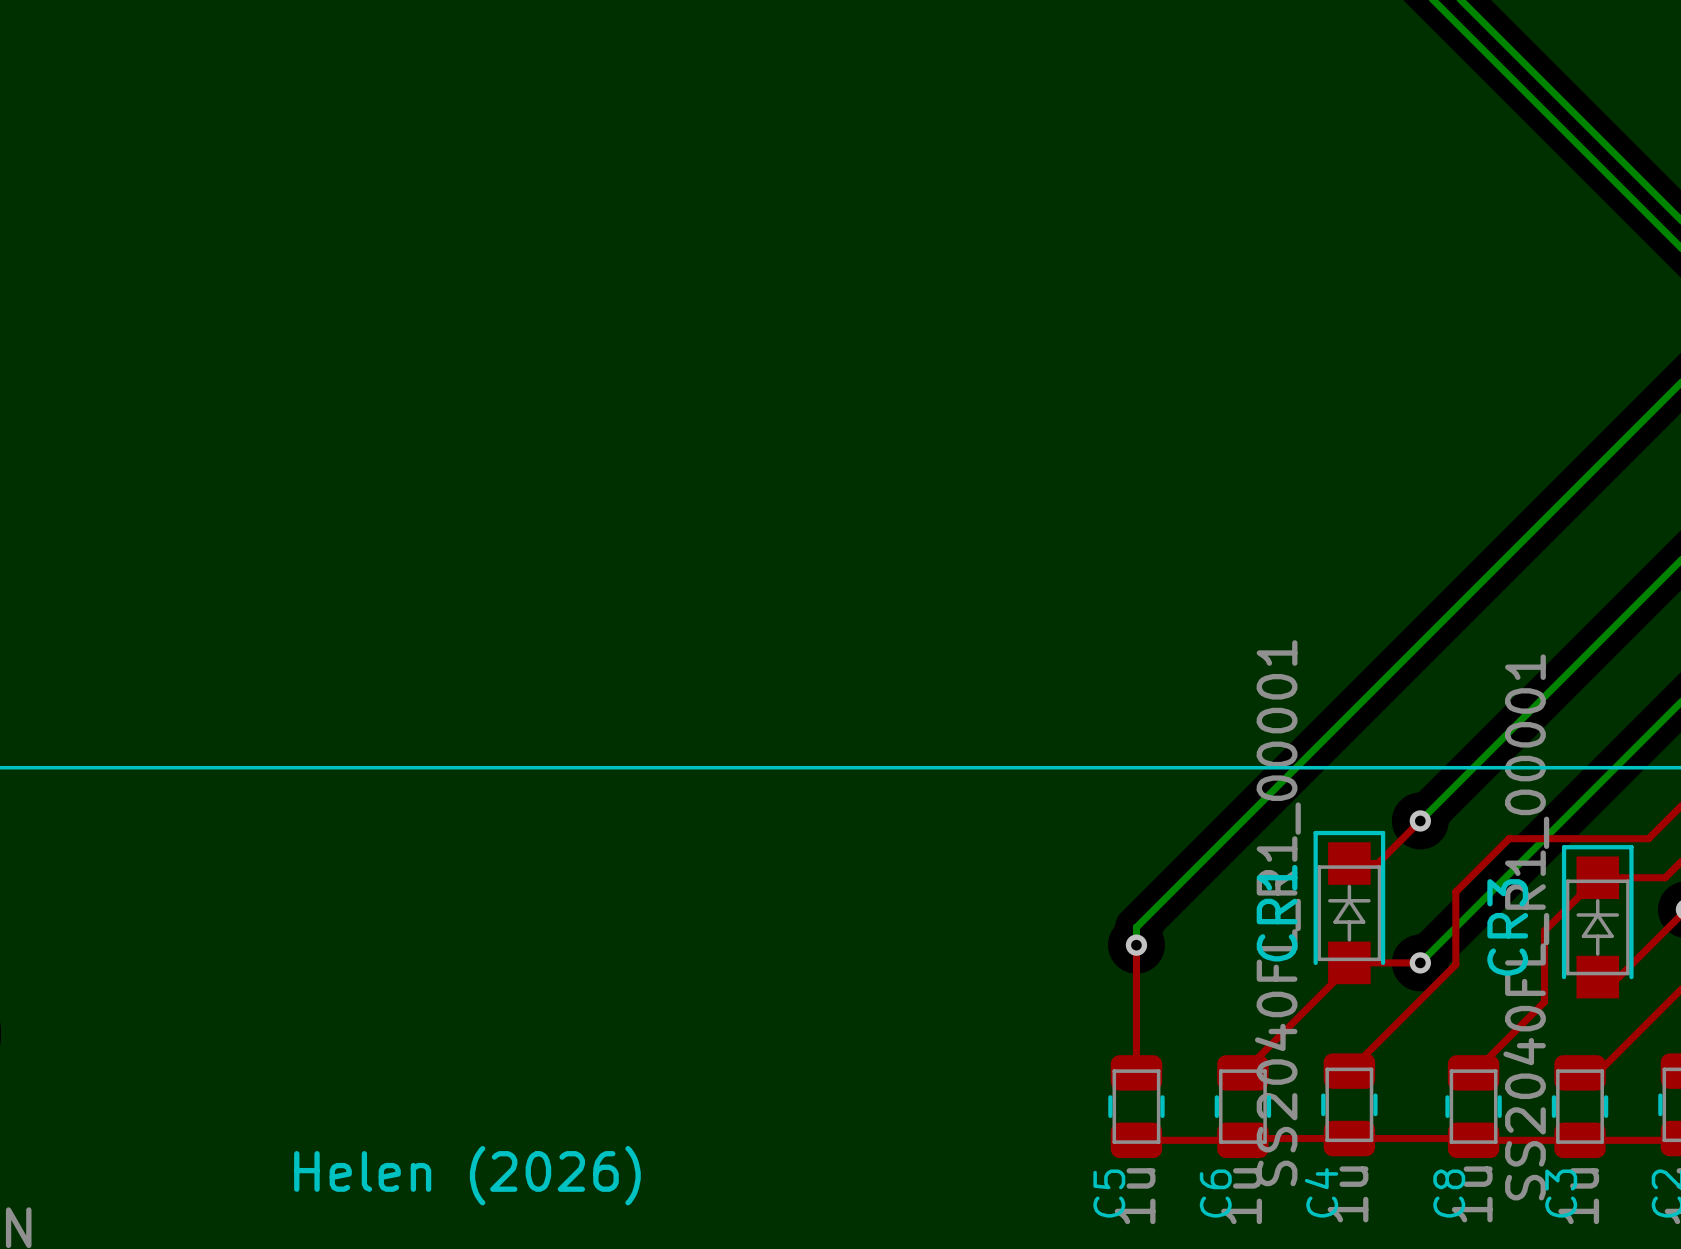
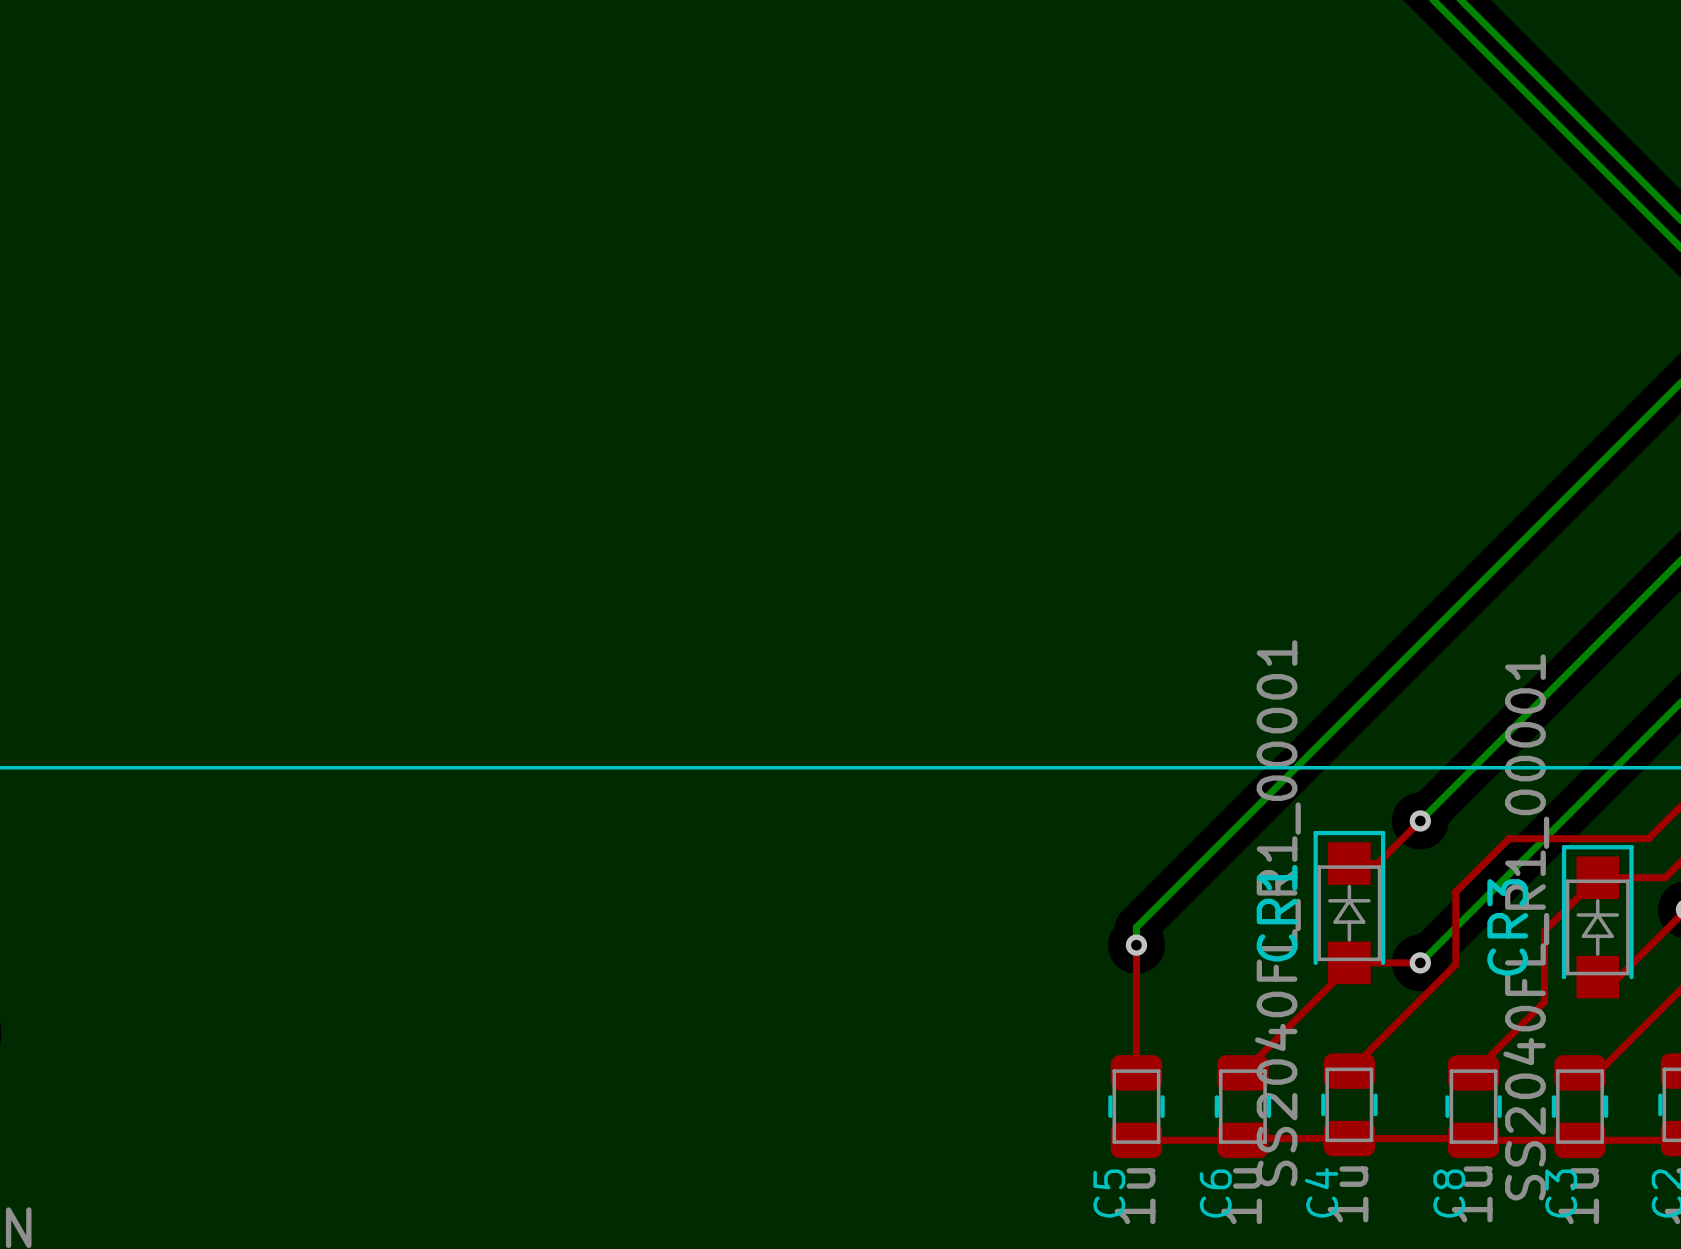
text: Helen (2026) (467, 1175) -> none

